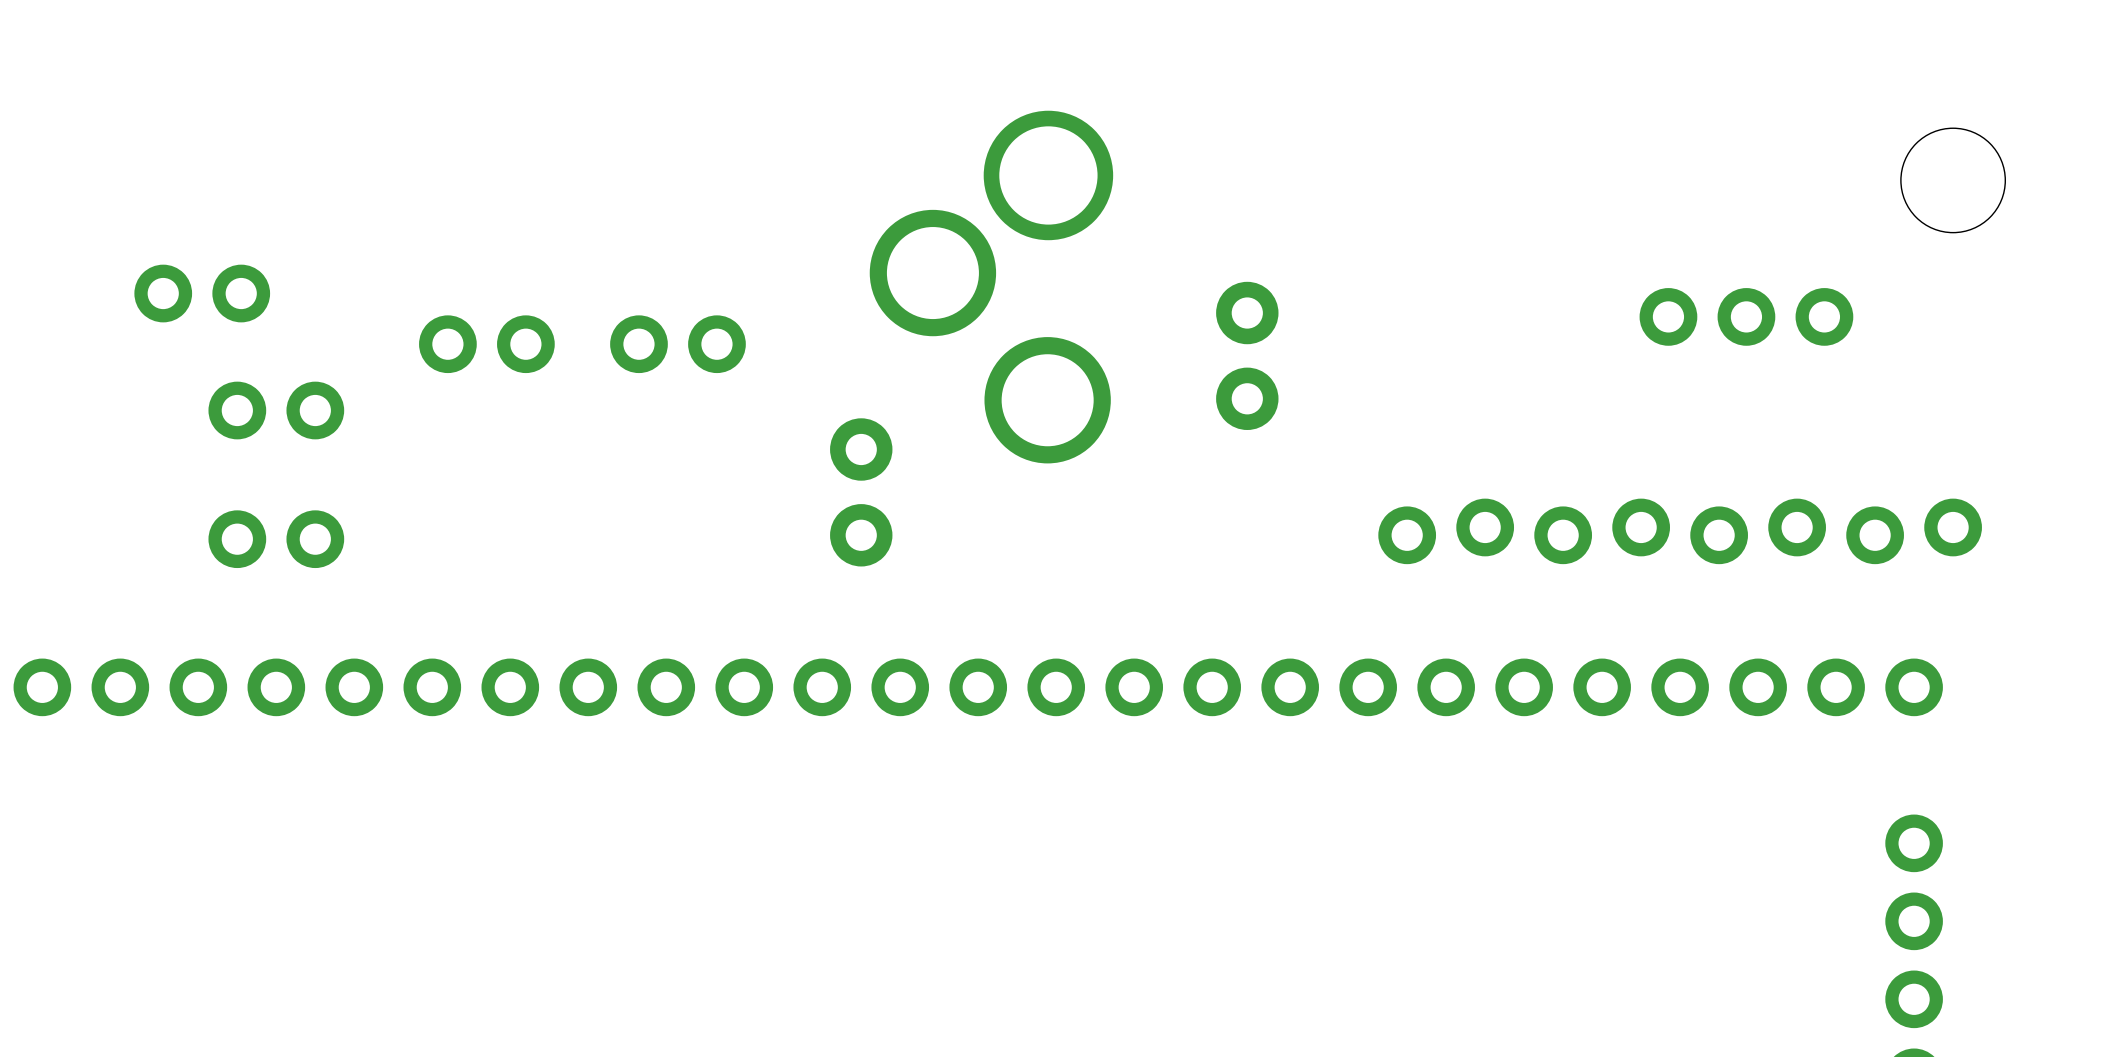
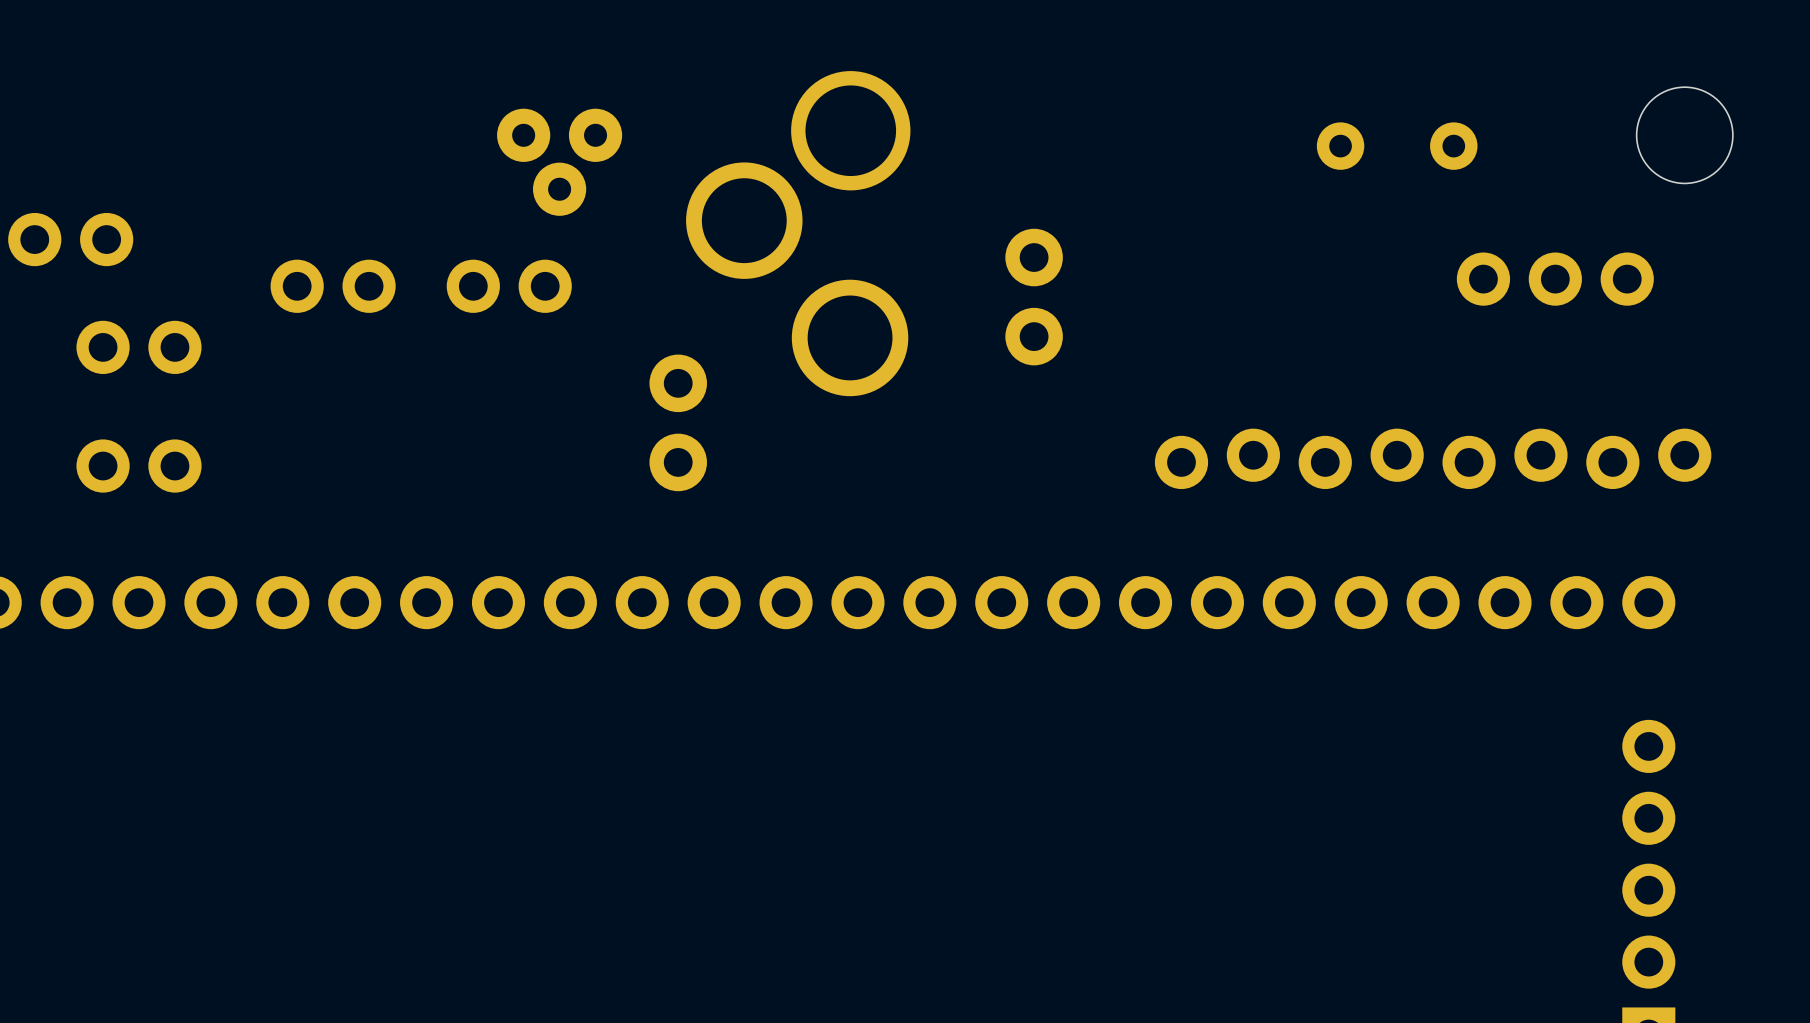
part: none -> (1397, 146)
part: none -> (559, 162)
part position: (1746, 316) -> (1555, 279)

